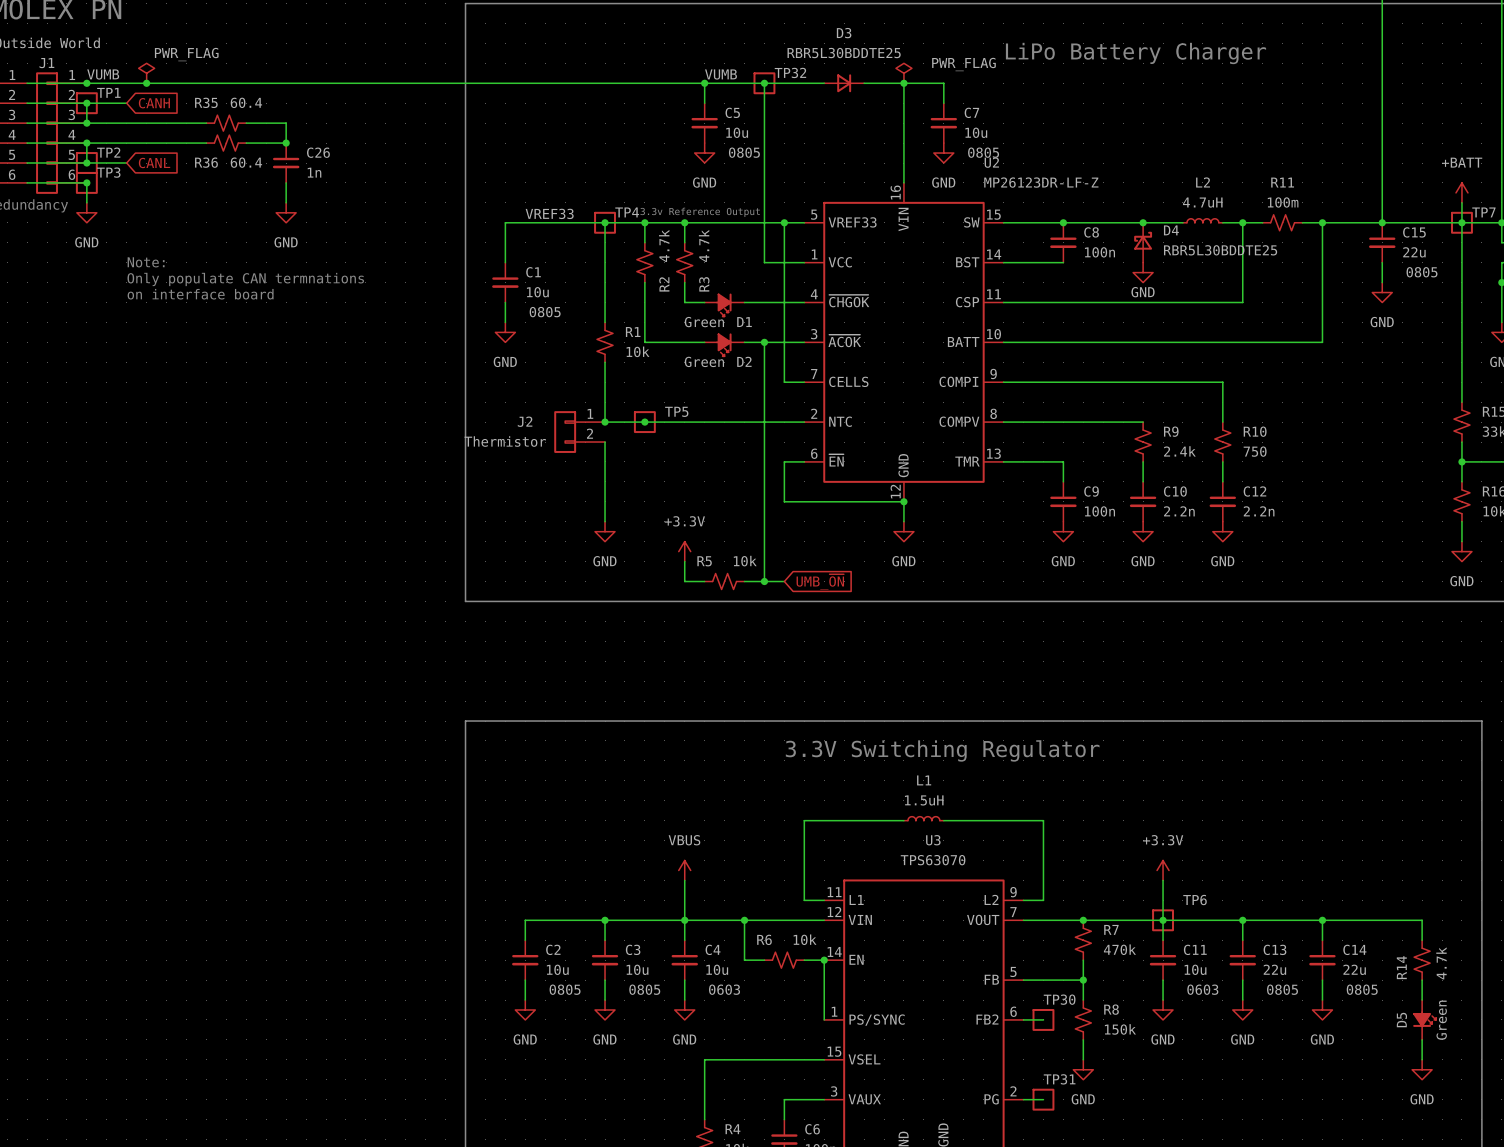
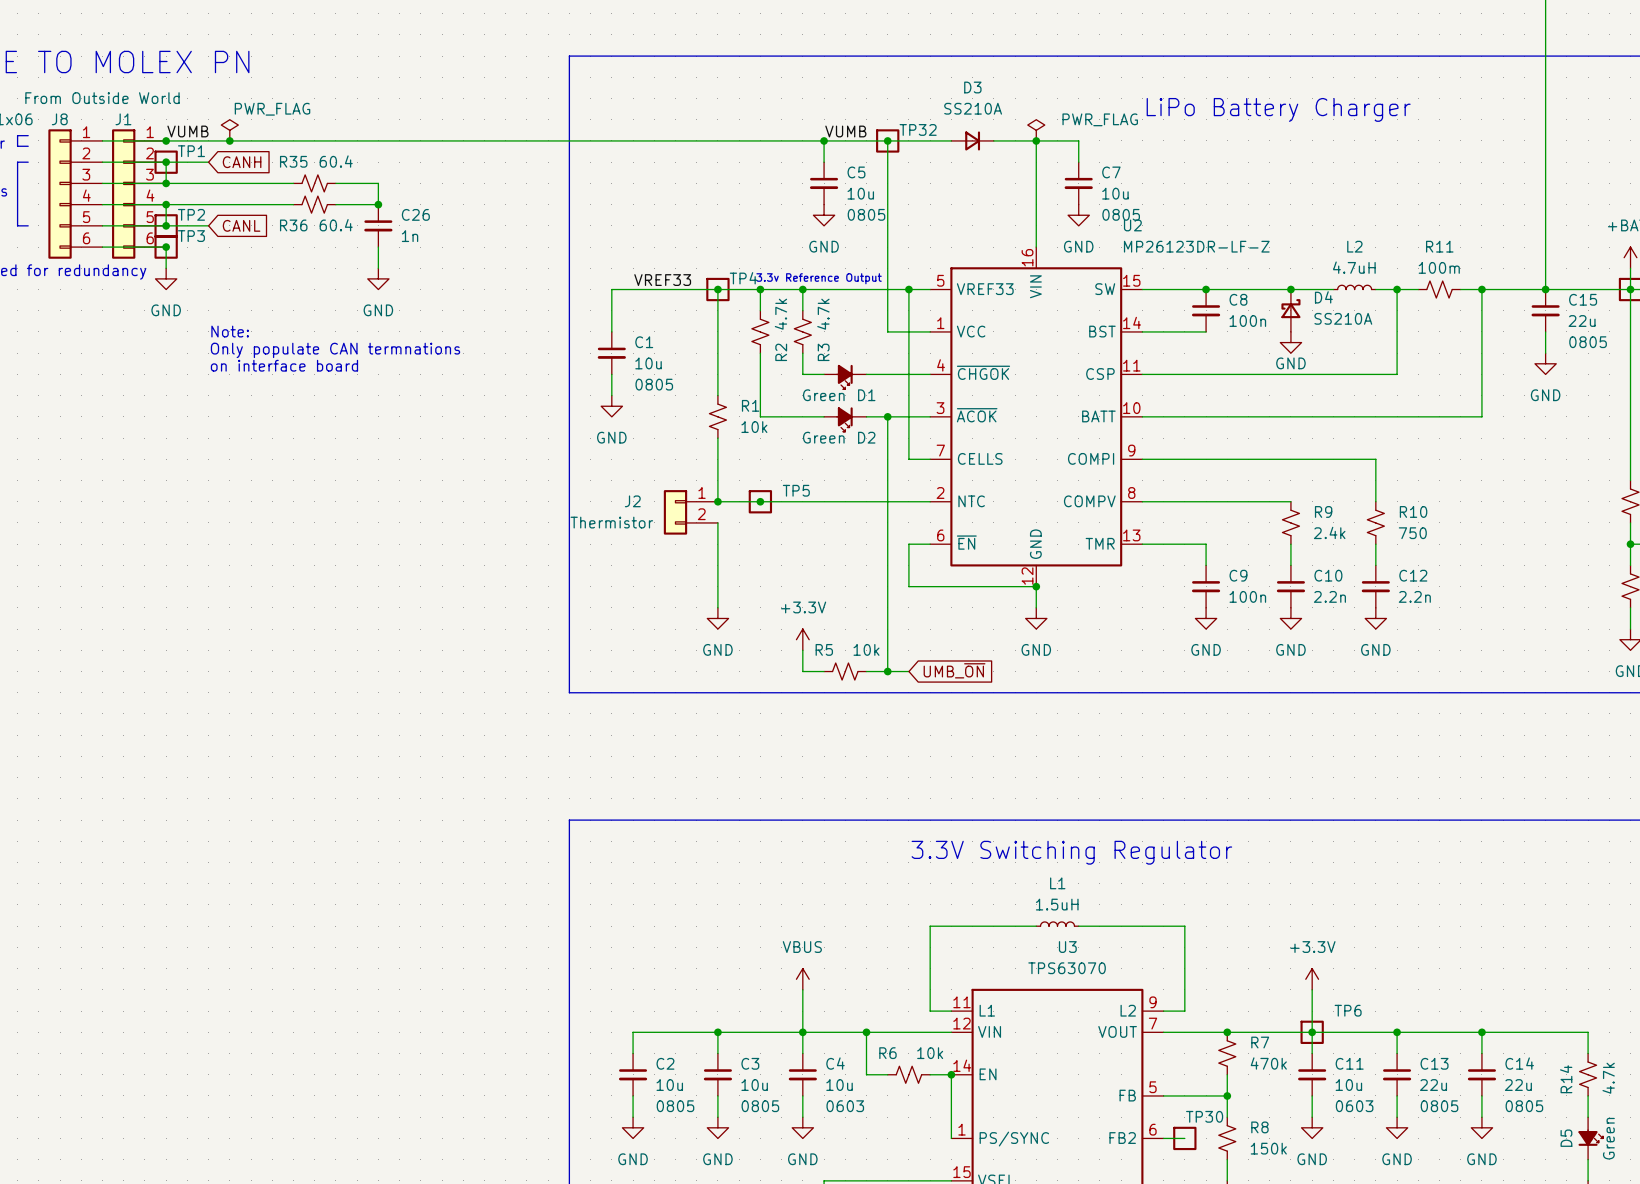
D3 value: RBR5L30BDDTE25 (844, 53) -> SS210A (973, 108)
D4 value: RBR5L30BDDTE25 (1220, 250) -> SS210A (1343, 318)

